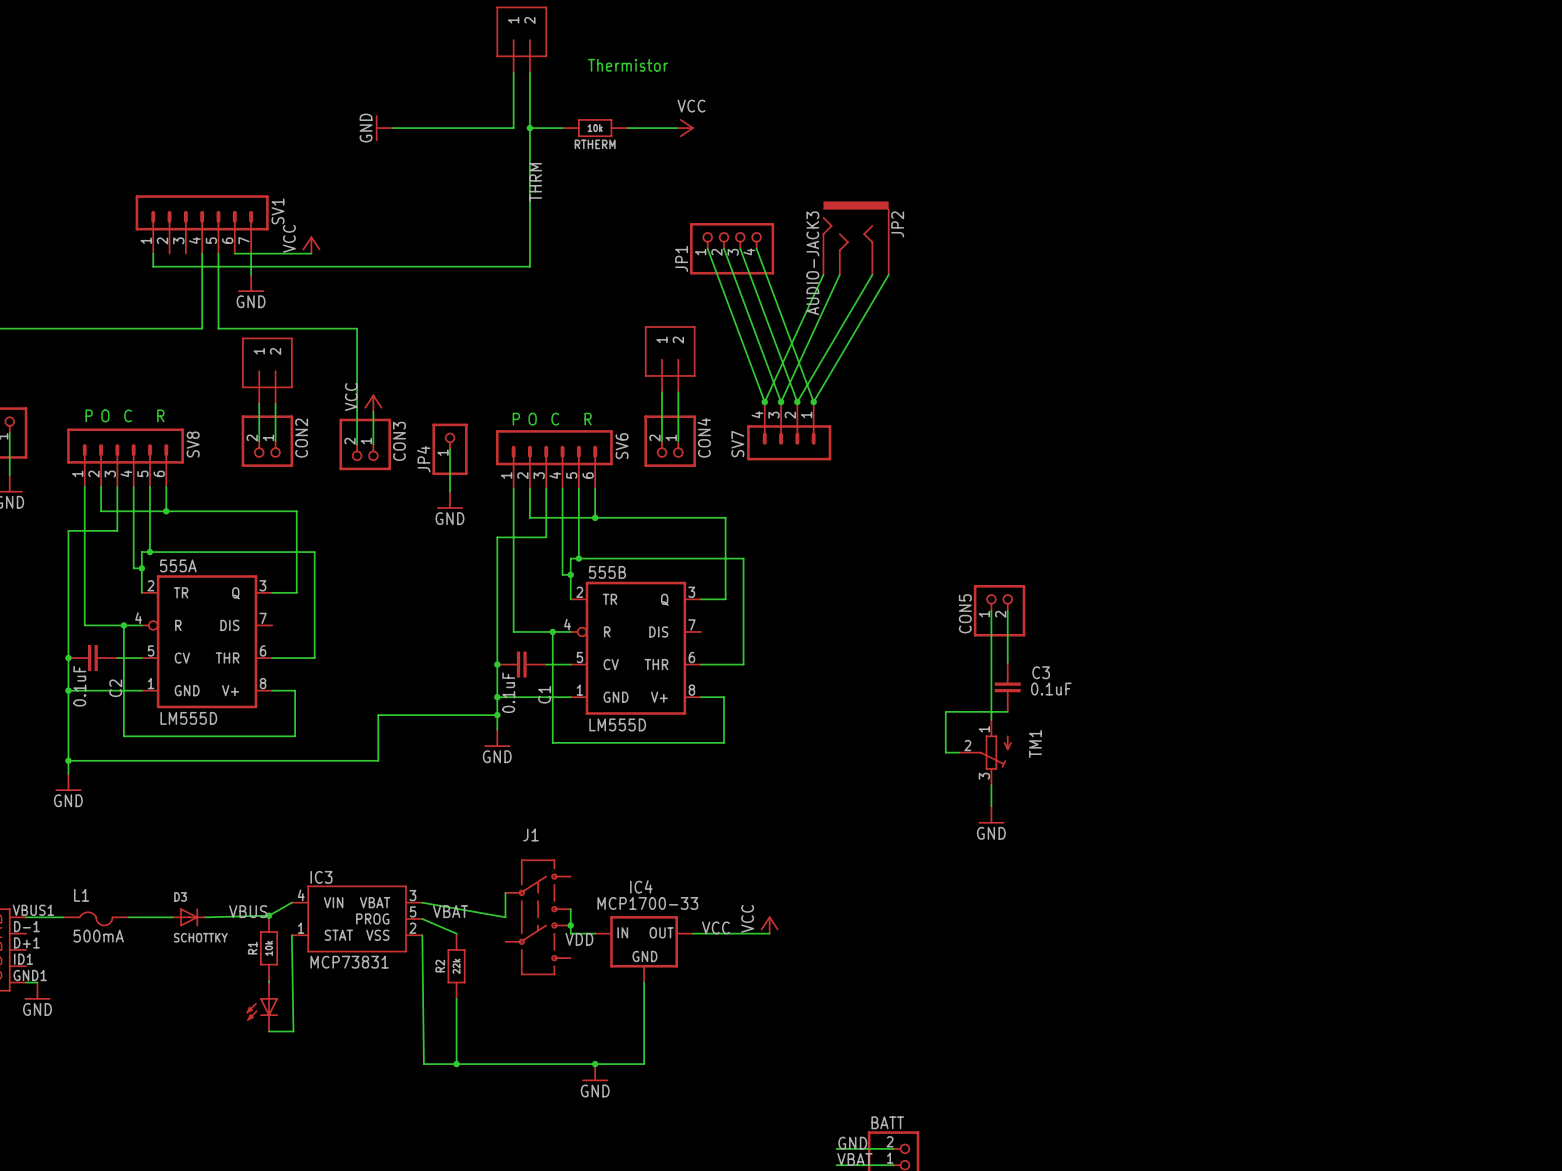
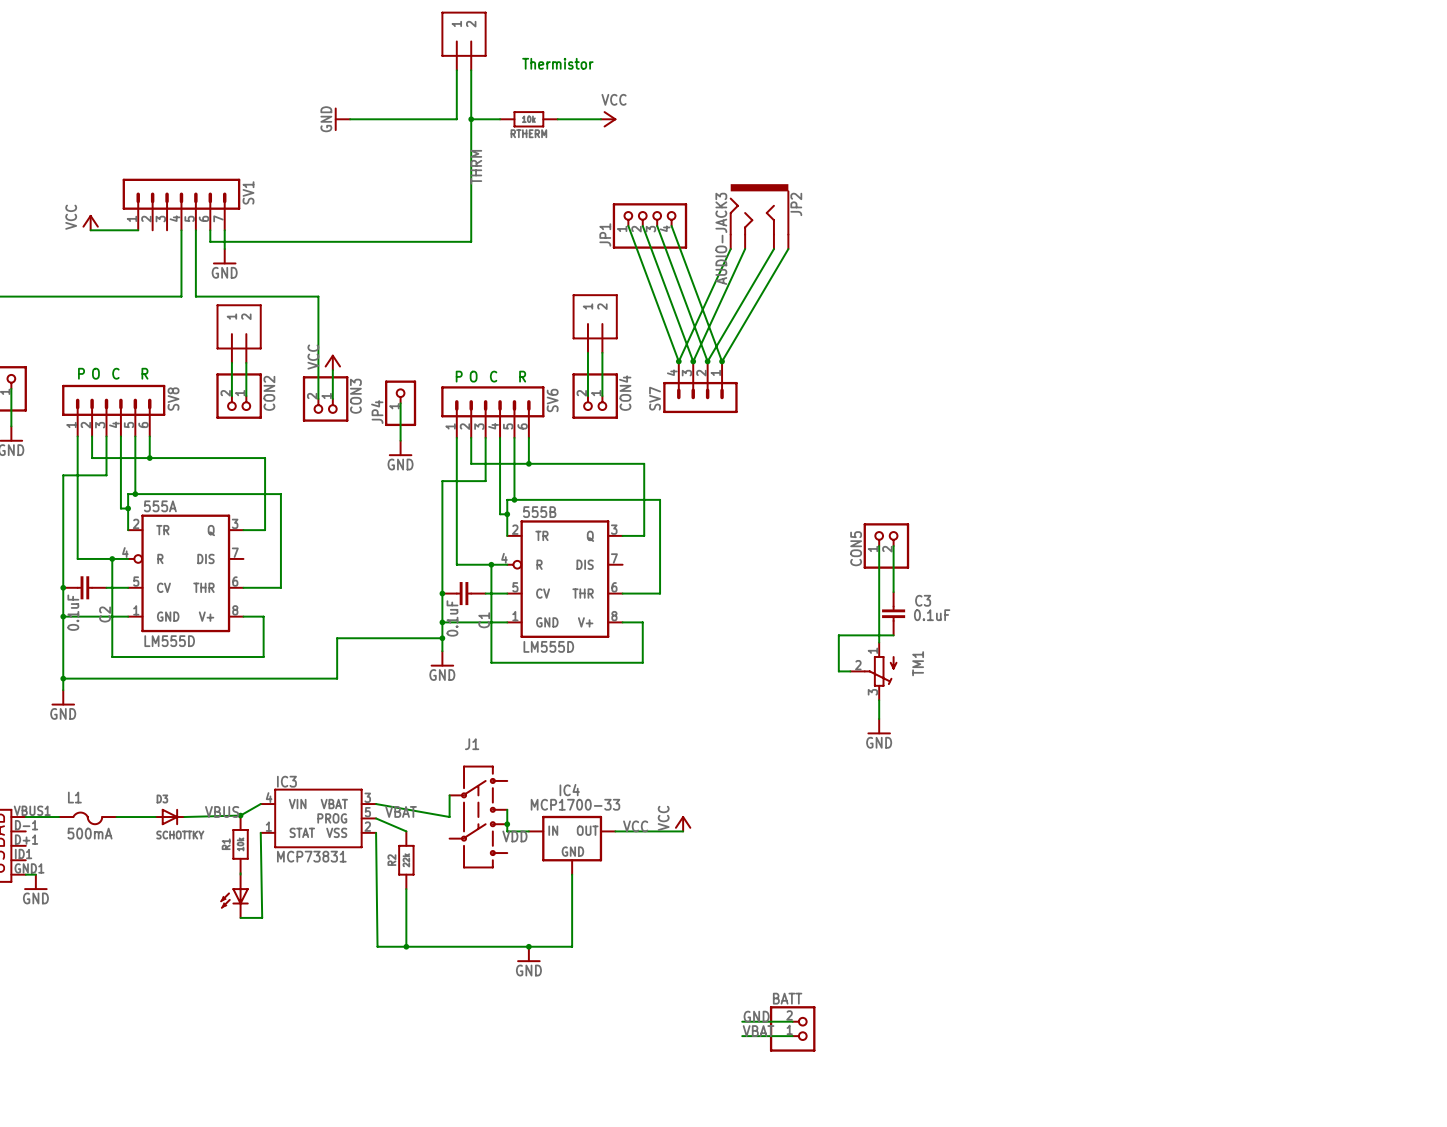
power symbol: none -> VCC (90, 222)
power symbol: VCC (311, 245) -> none
wire: (153, 253) (153, 266) (234, 266) -> (138, 230) (90, 230)
wire: (234, 253) (311, 253) -> (210, 230) (210, 241)

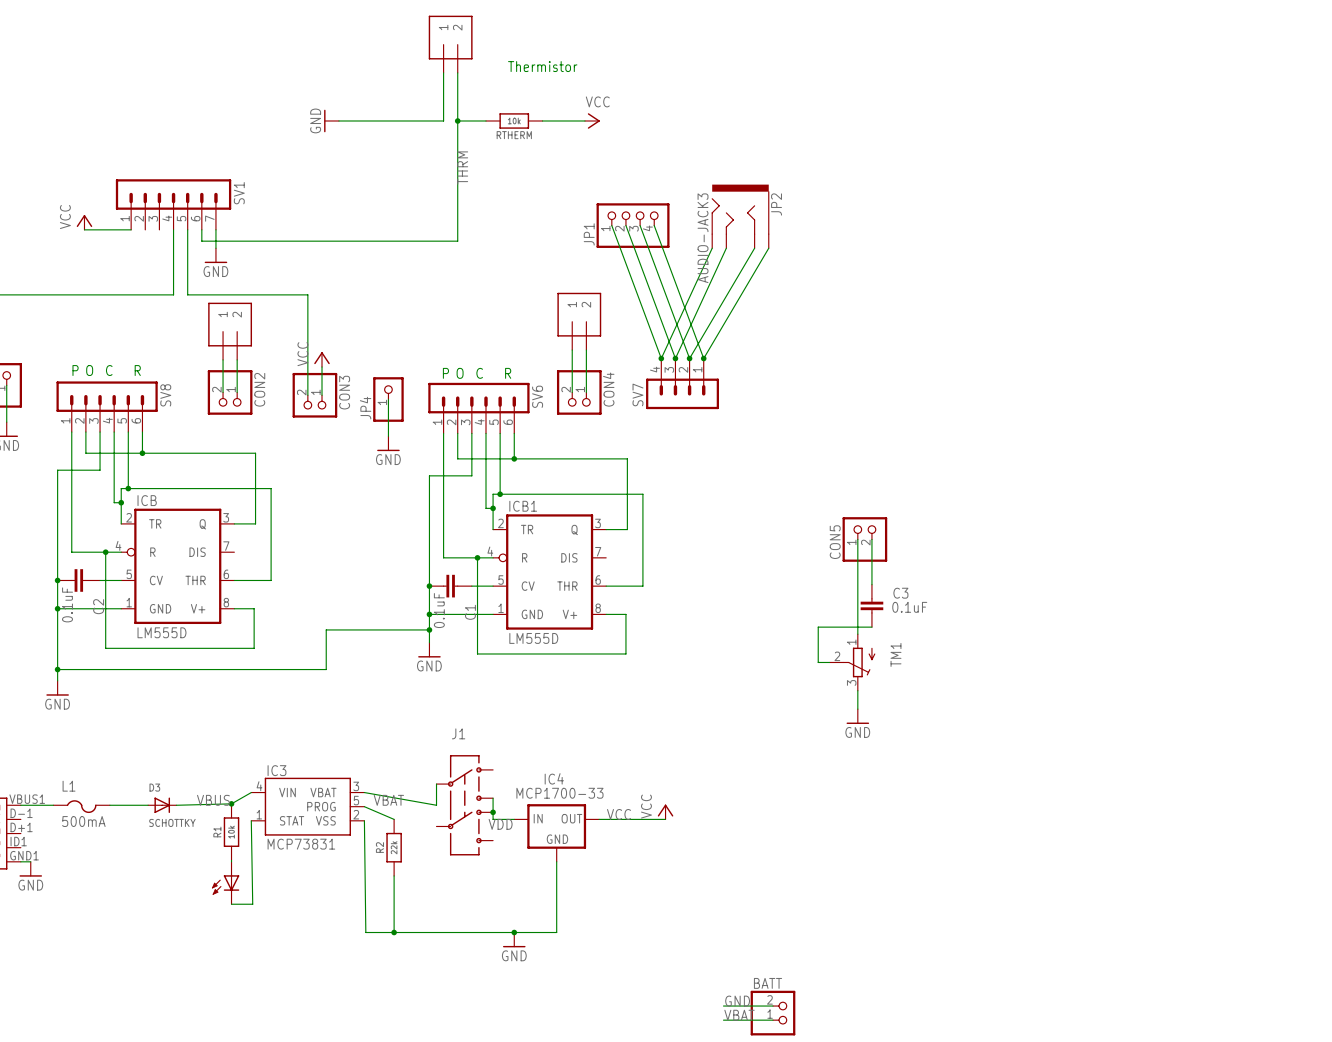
555A name: 555A (160, 506) -> ICB (147, 500)
555B name: 555B (539, 512) -> ICB1 (523, 506)

